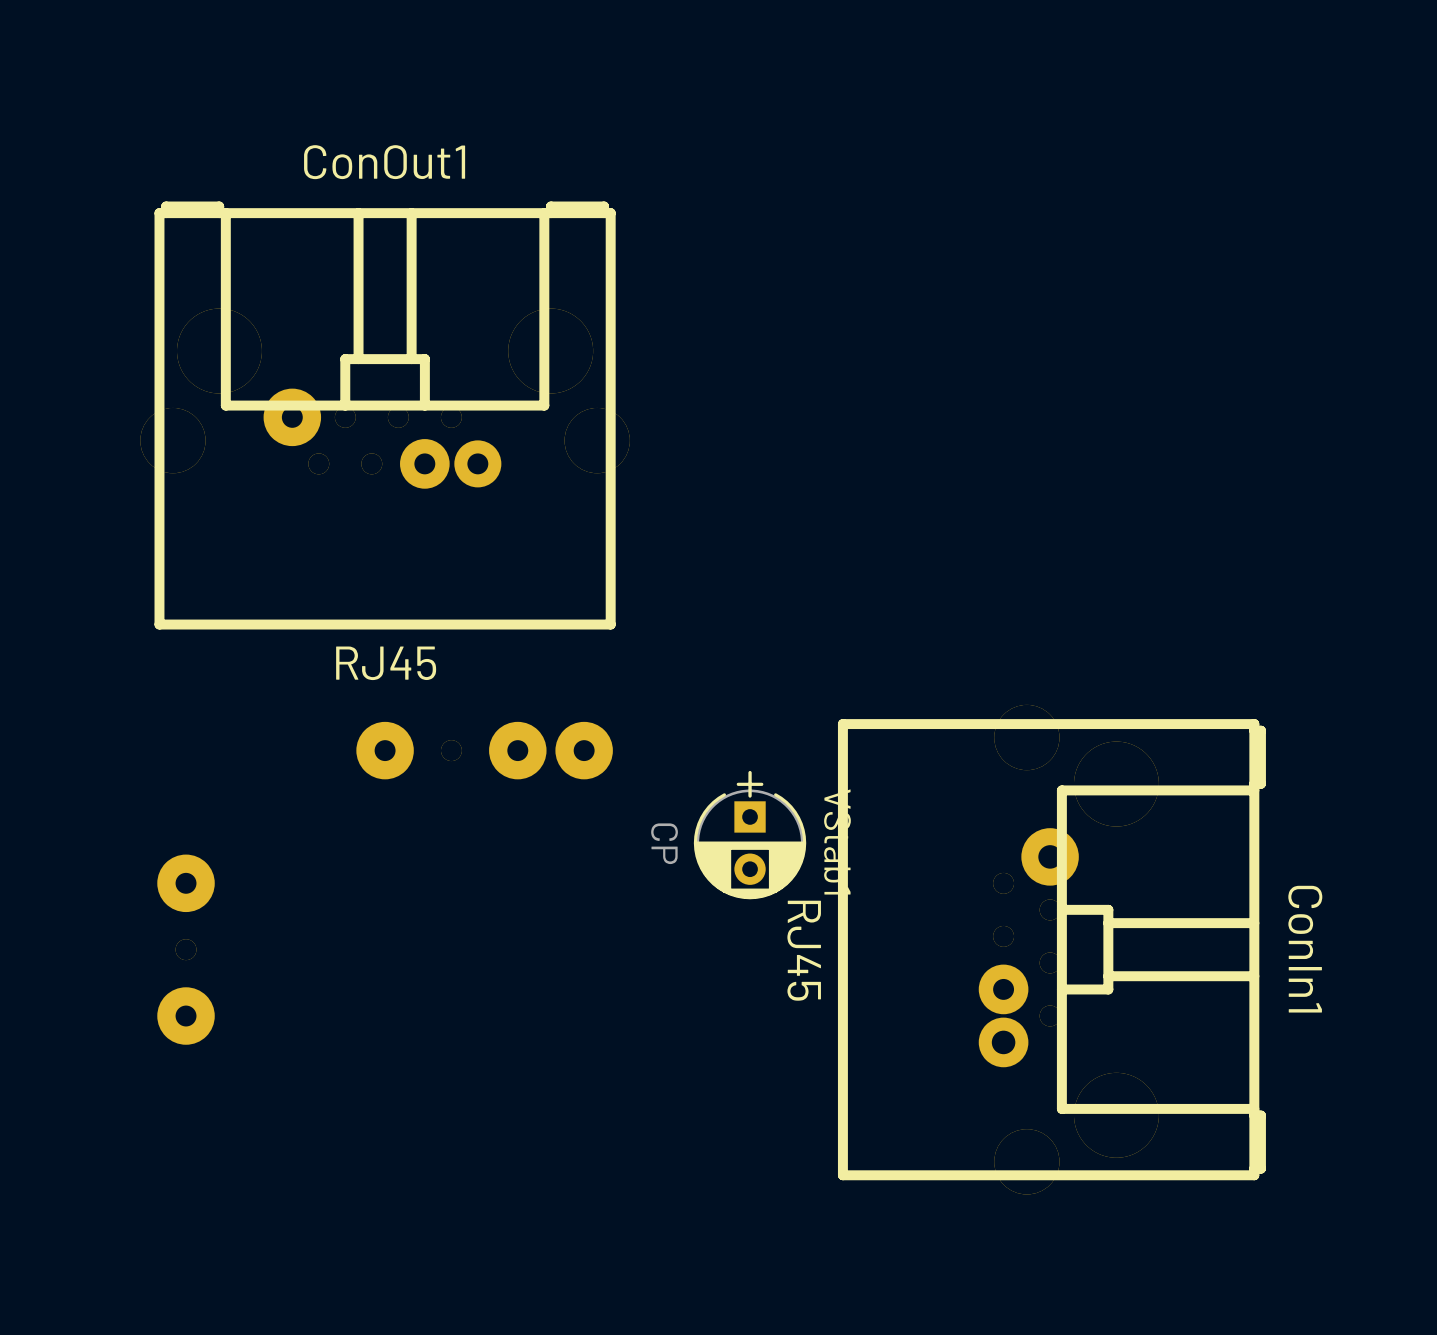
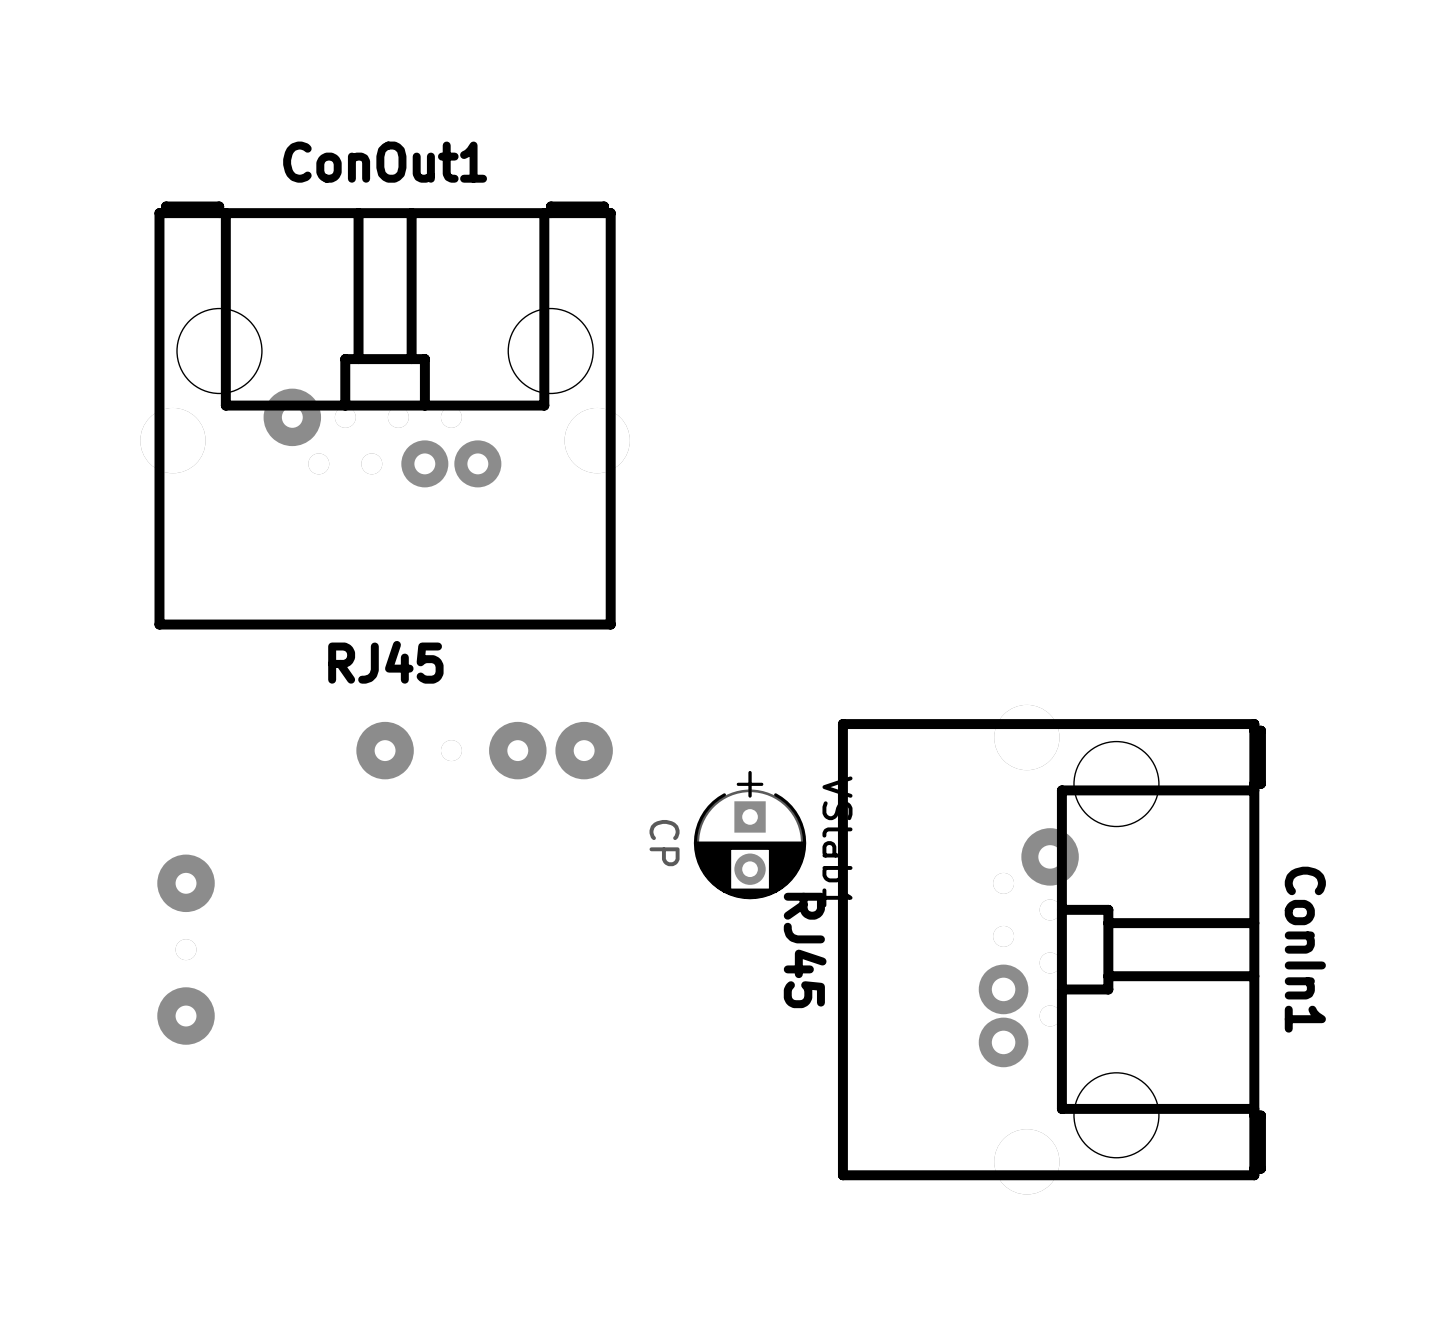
ConOut1 footprint: [140, 201, 630, 630] -> [140, 201, 630, 630]
ConIn1 footprint: [837, 704, 1266, 1195] -> [837, 704, 1266, 1195]

